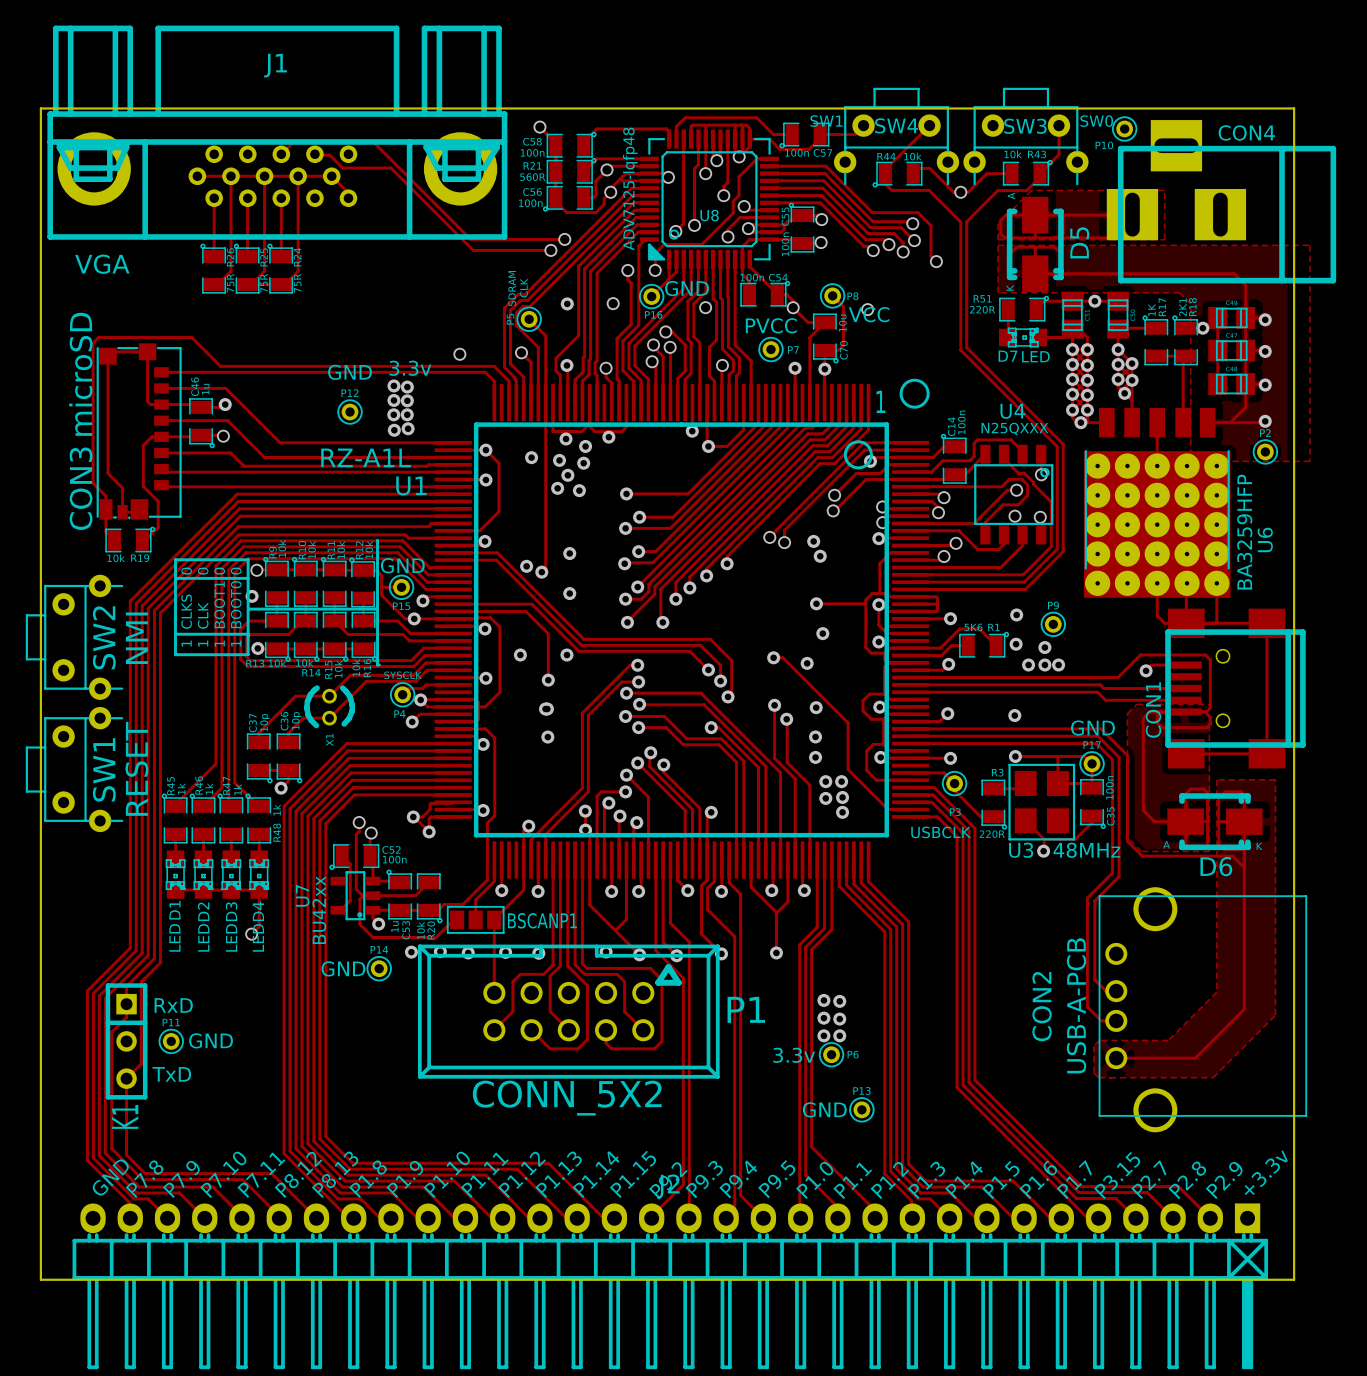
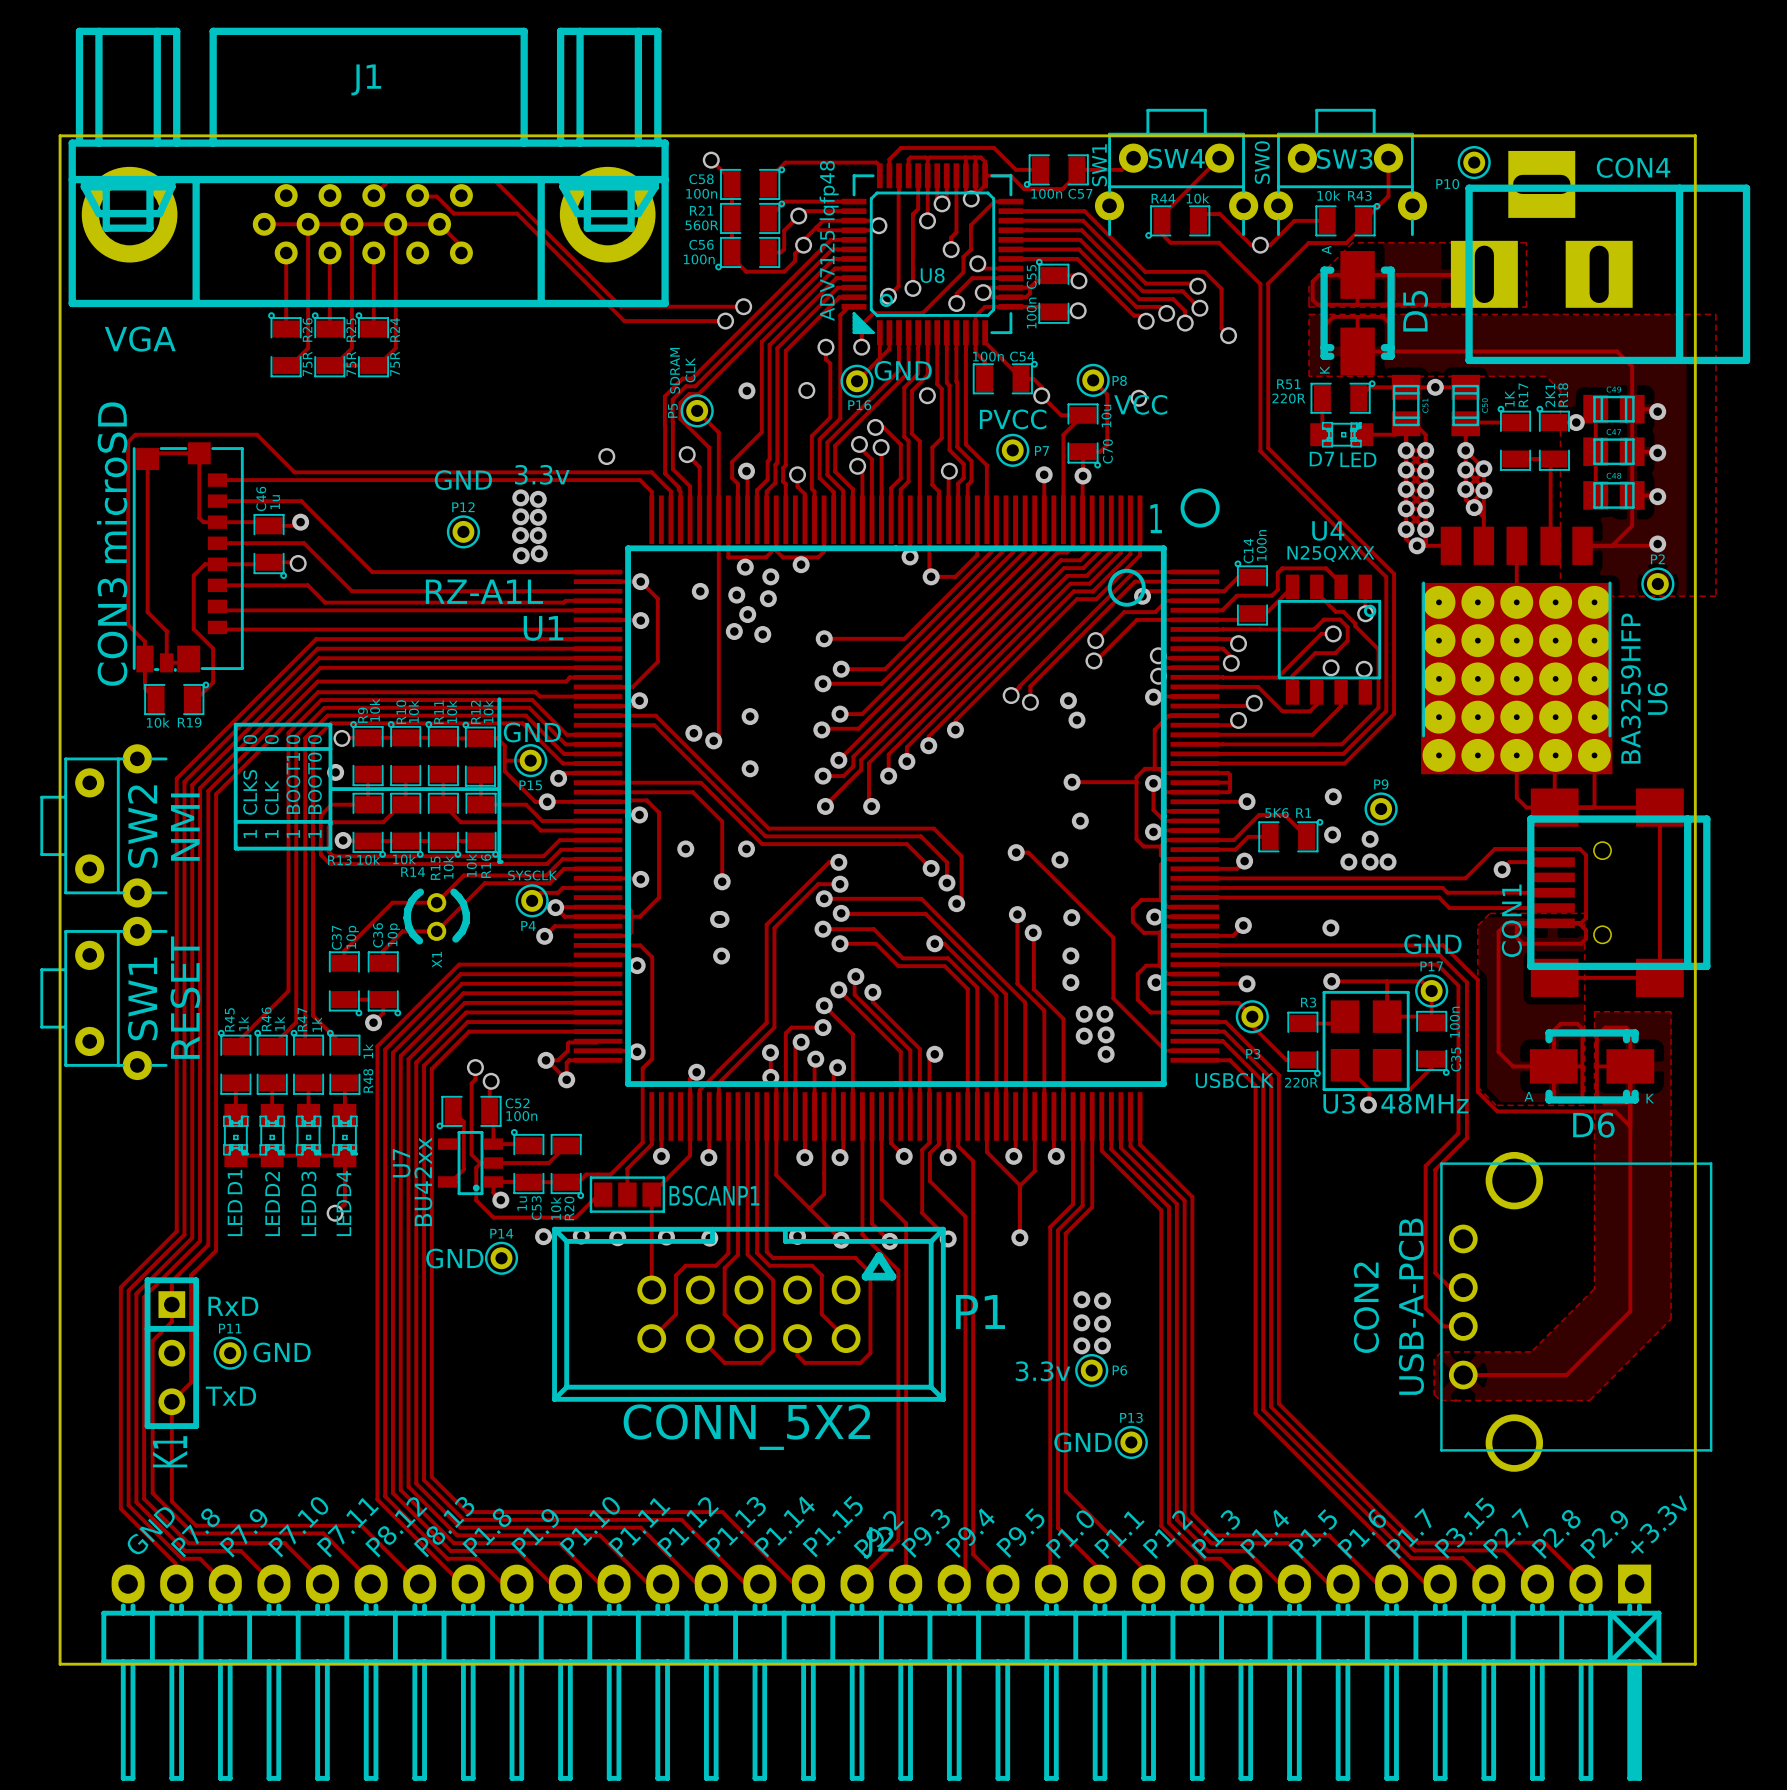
SW4 value rotation: 0° (826, 121) -> 90° counterclockwise (1099, 165)
SW3 value rotation: 0° (1096, 121) -> 90° counterclockwise (1262, 162)
SW3 value position: SW0 (1096, 121) -> SW0 (1262, 162)

